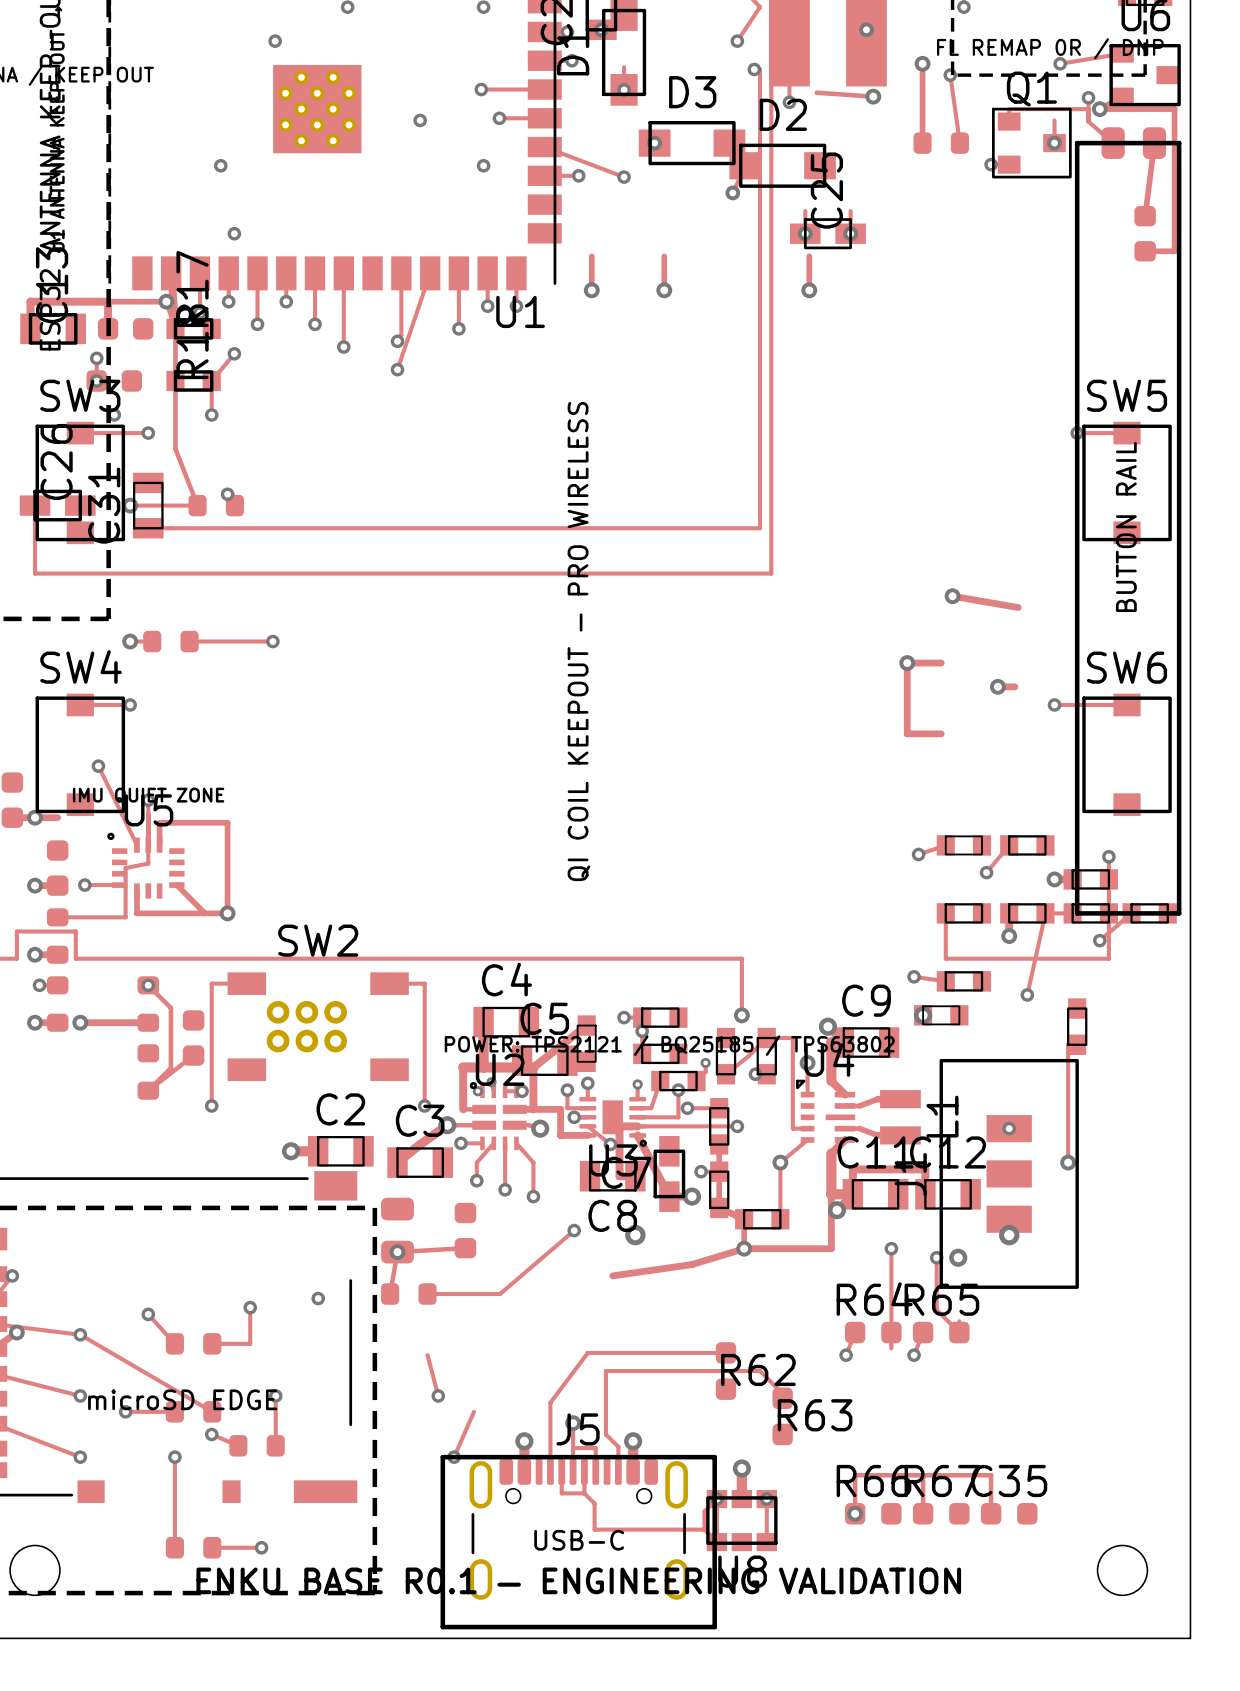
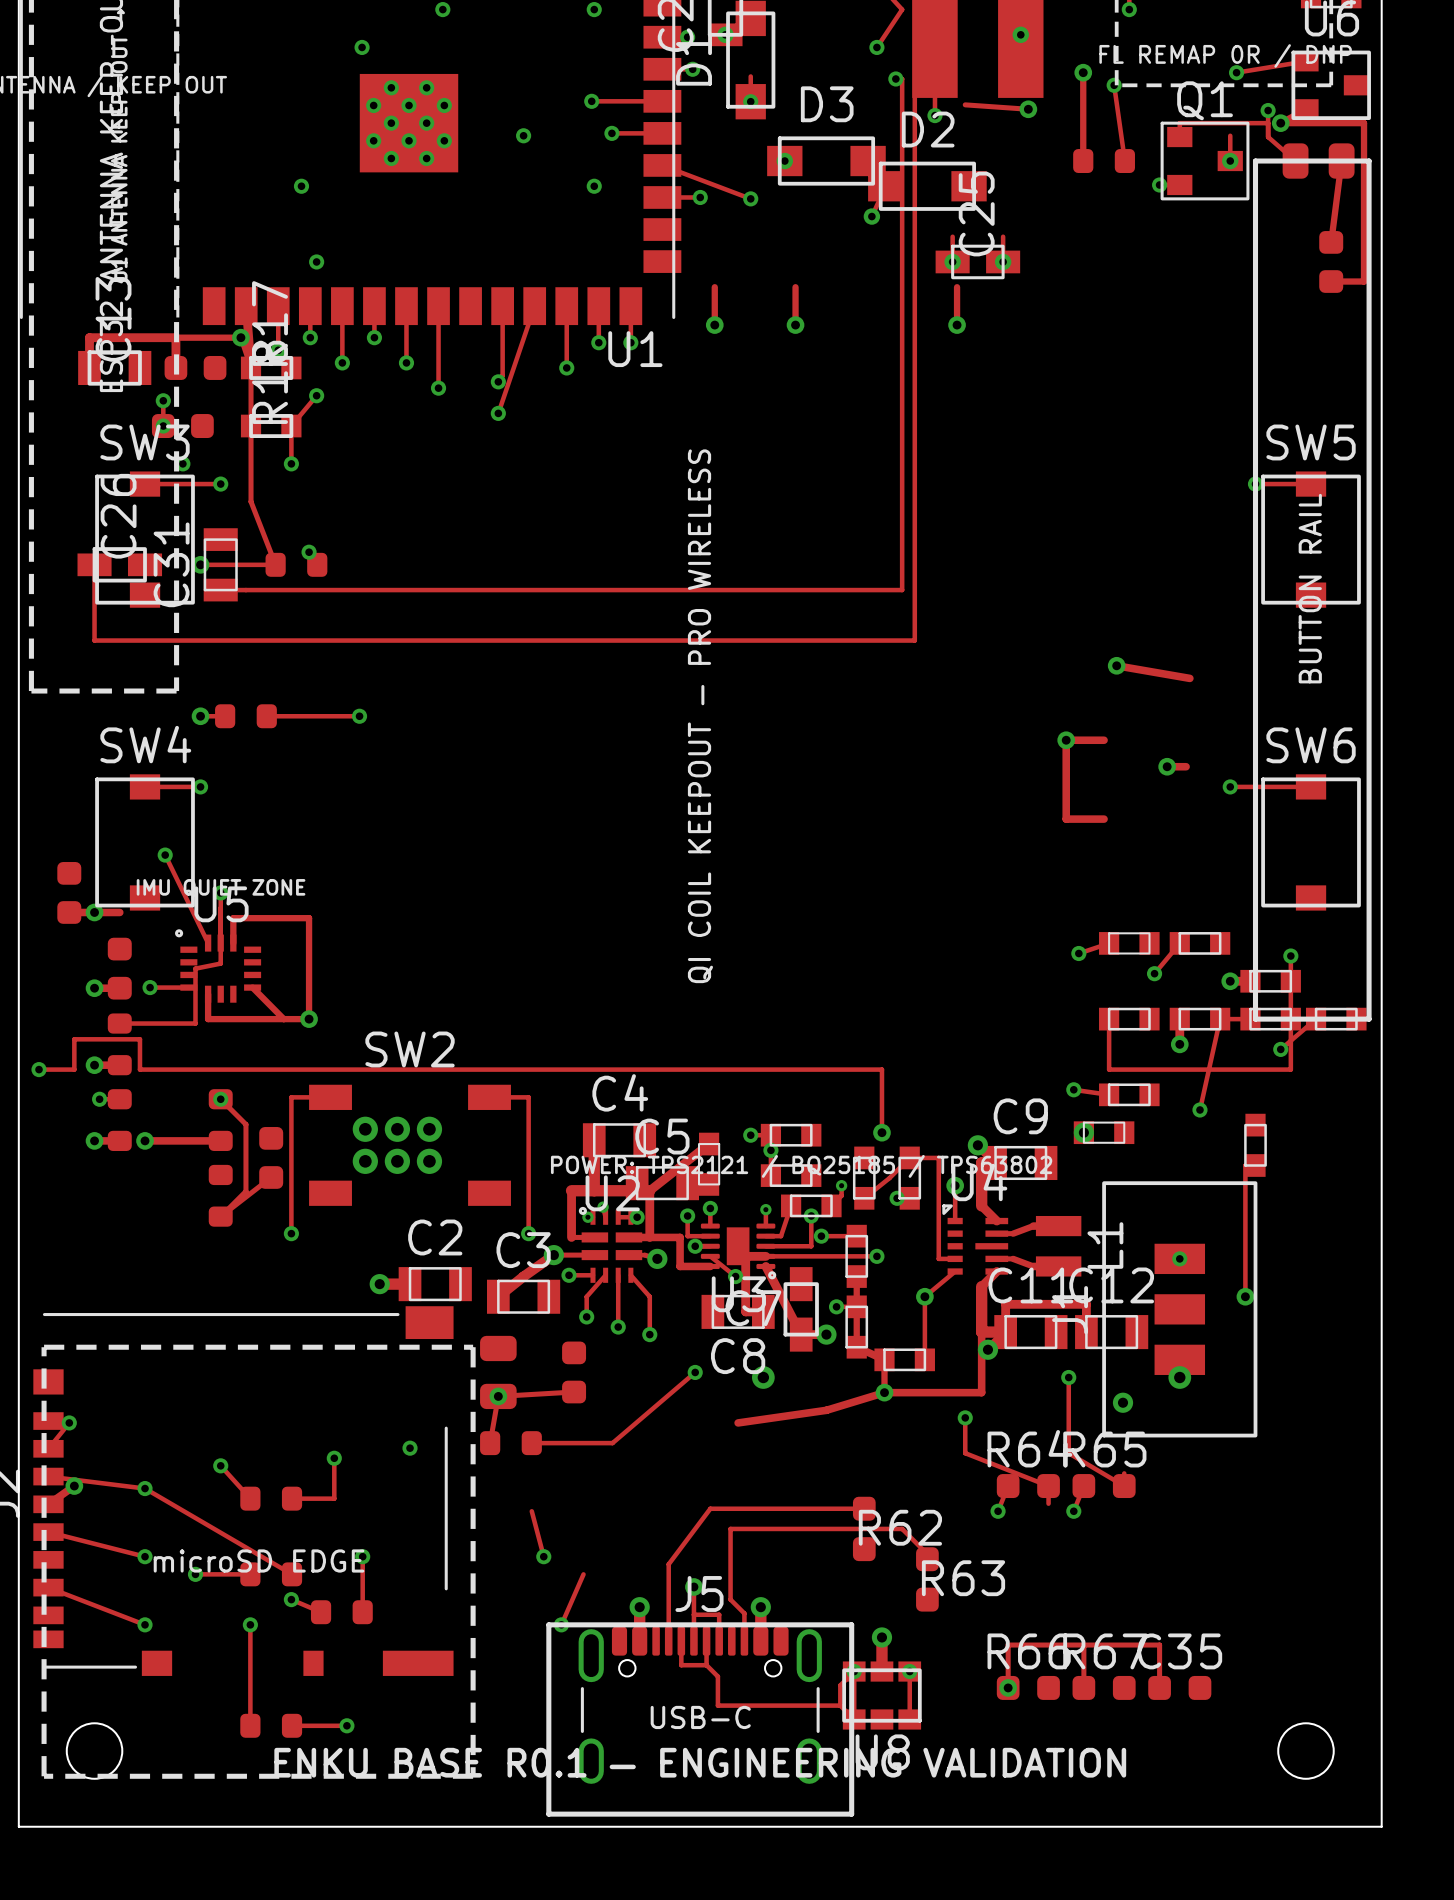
via: none -> (1068, 1377)
track: (891, 1248) (891, 1332) -> (965, 1417) (965, 1453) (1048, 1486)
via: (891, 1248) -> none
track: (936, 1257) (936, 1309) (959, 1332) -> (1068, 1377) (1068, 1453) (1124, 1486)
via: (936, 1257) -> none
via: none -> (965, 1417)

